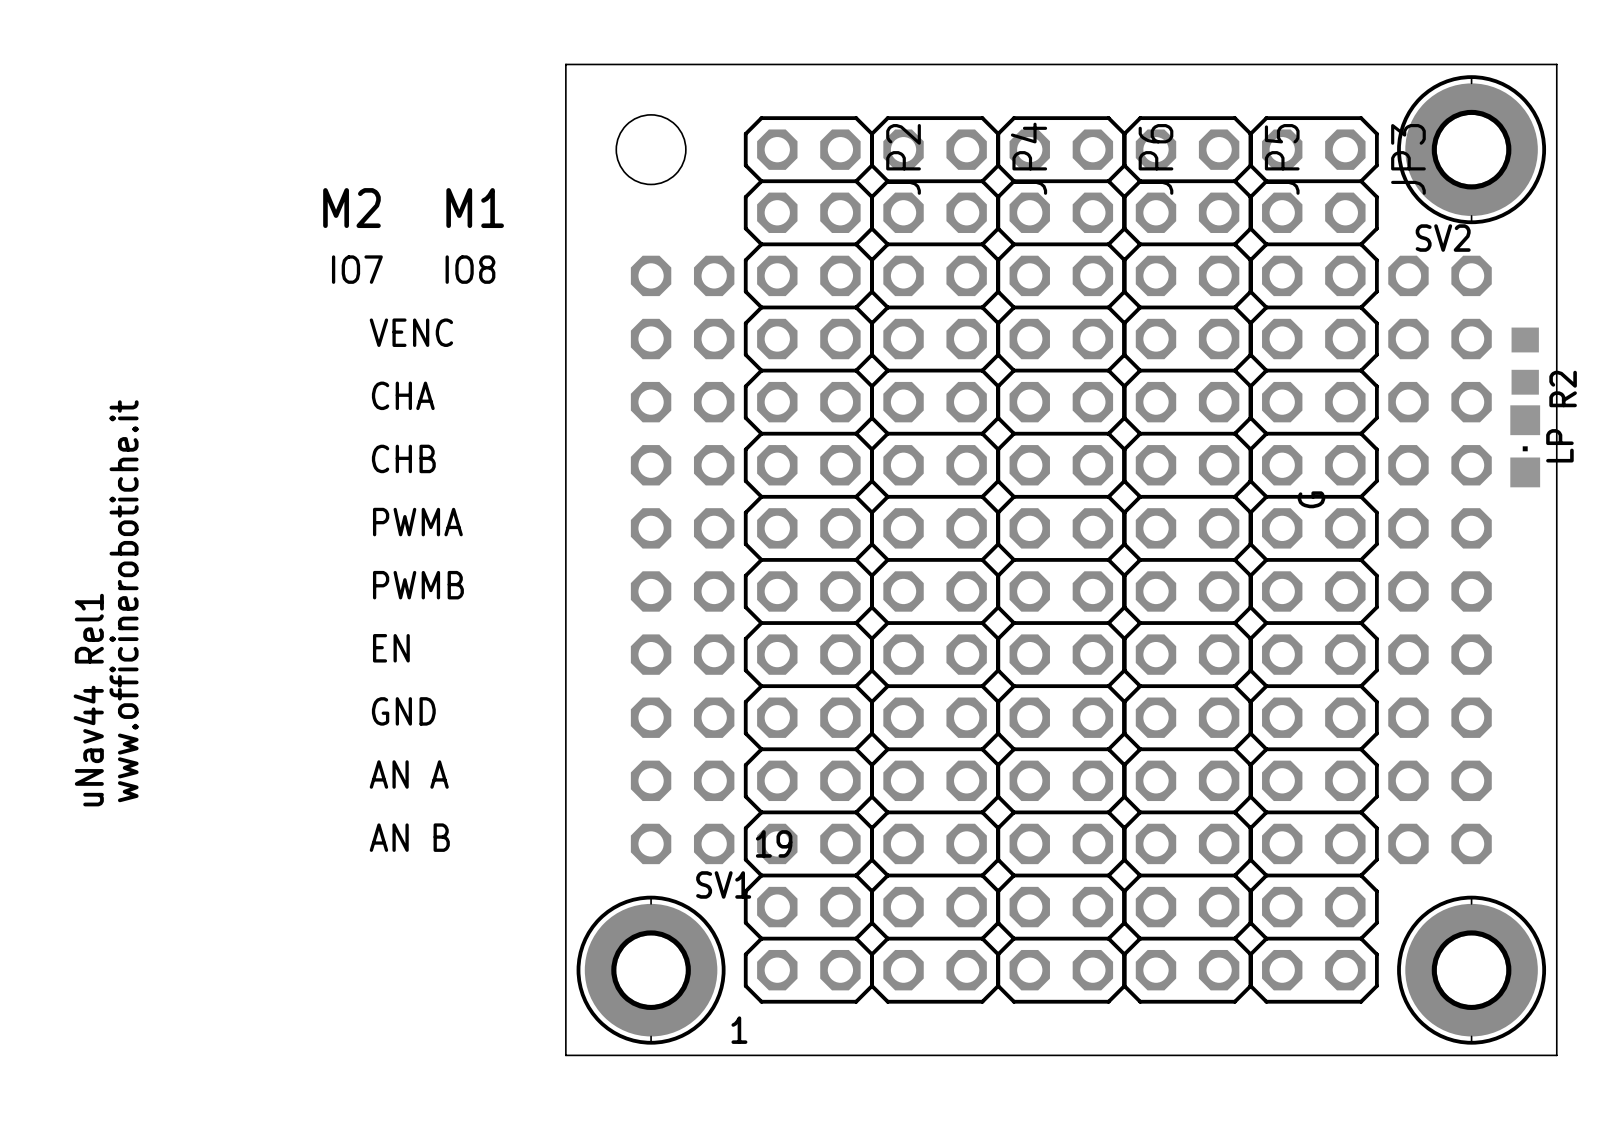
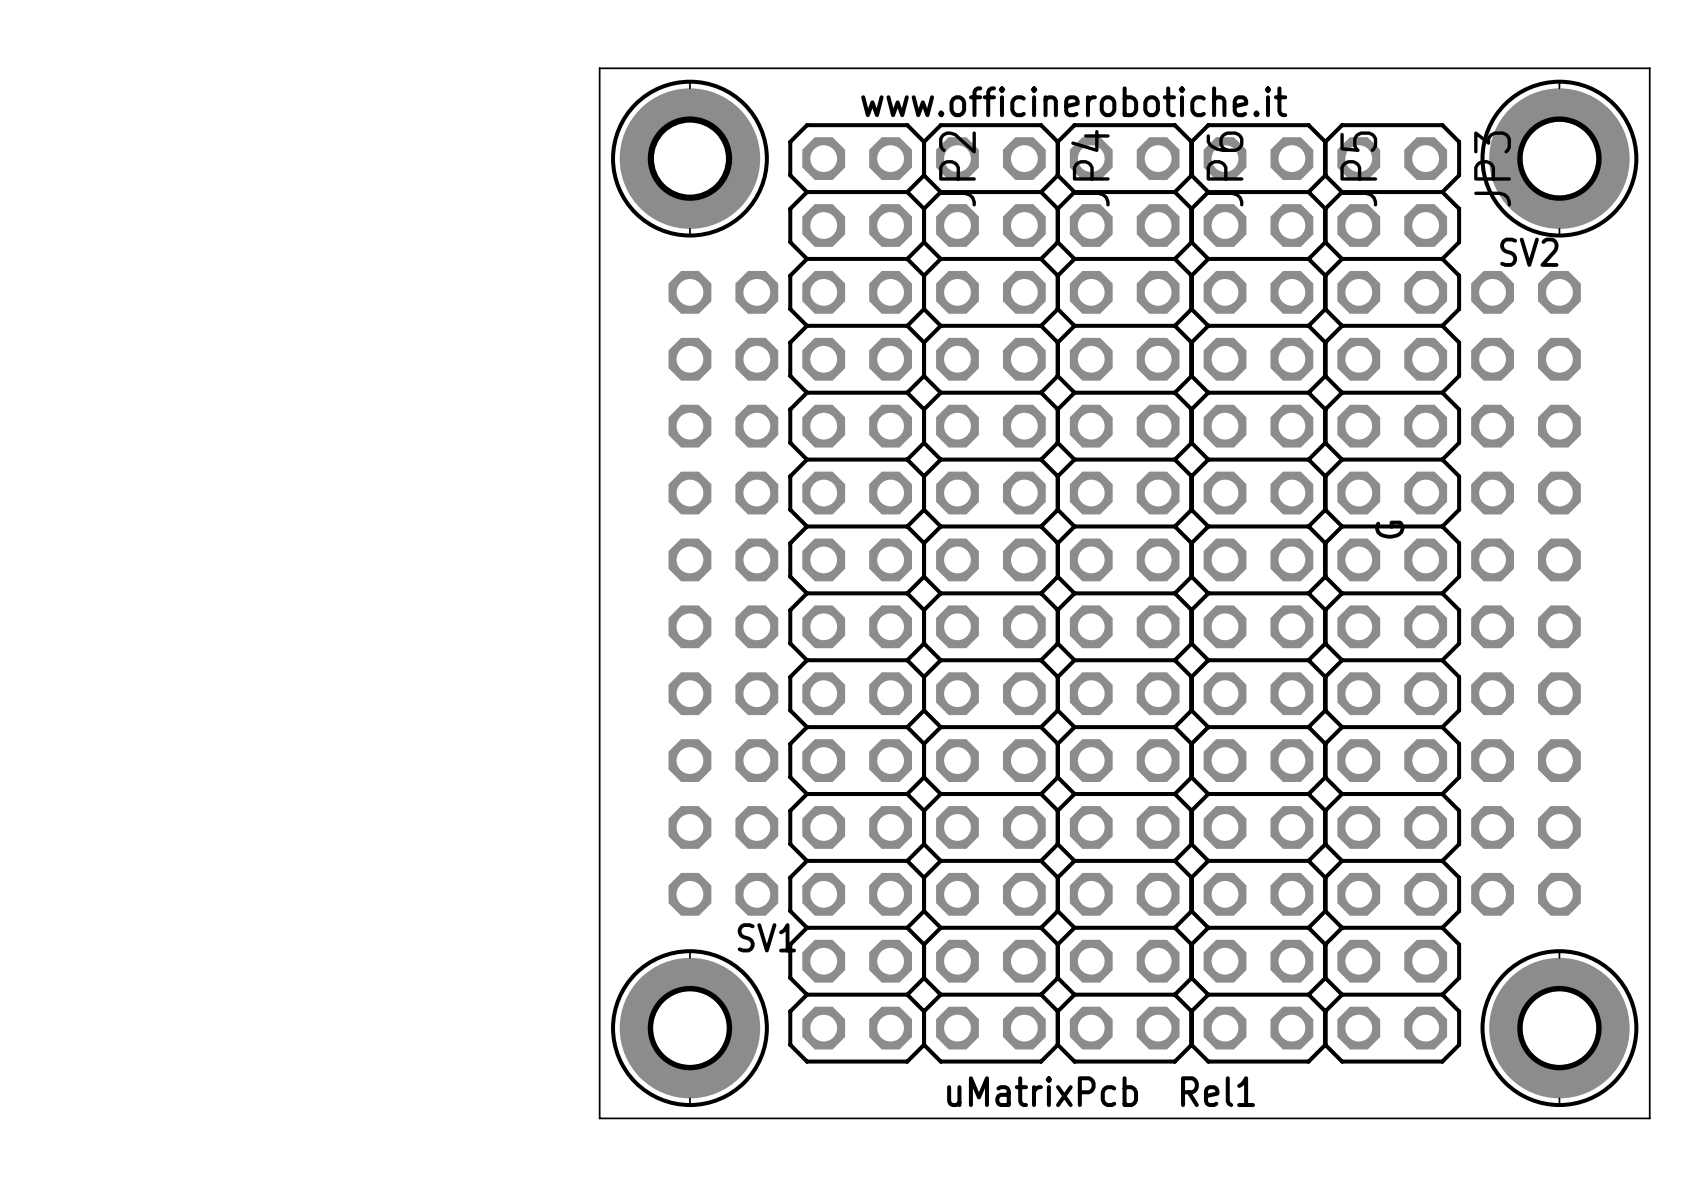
text: none -> www.officinerobotiche.it (1074, 101)
part: none -> (689, 158)
text: M2 (351, 208) -> none
text: M1 (475, 208) -> none
text: IO7 (357, 269) -> none
text: IO8 (470, 269) -> none
text: VENC (411, 332) -> none
R2: (1525, 361) -> none
text: CHA (403, 395) -> none
LP: (1525, 446) -> none
text: CHB (403, 458) -> none
text: PWMA (417, 522) -> none
text: PWMB (418, 585) -> none
text: www.officinerobotiche.it (124, 601) -> none
text: EN (391, 648) -> none
text: uNav44 Rel1 (88, 700) -> none
text: GND (403, 711) -> none
text: AN A (409, 774) -> none
text: AN B (409, 837) -> none
text: 19 (774, 843) -> none
text: 1 (739, 1030) -> none
text: none -> uMatrixPcb Rel1 (1101, 1091)

